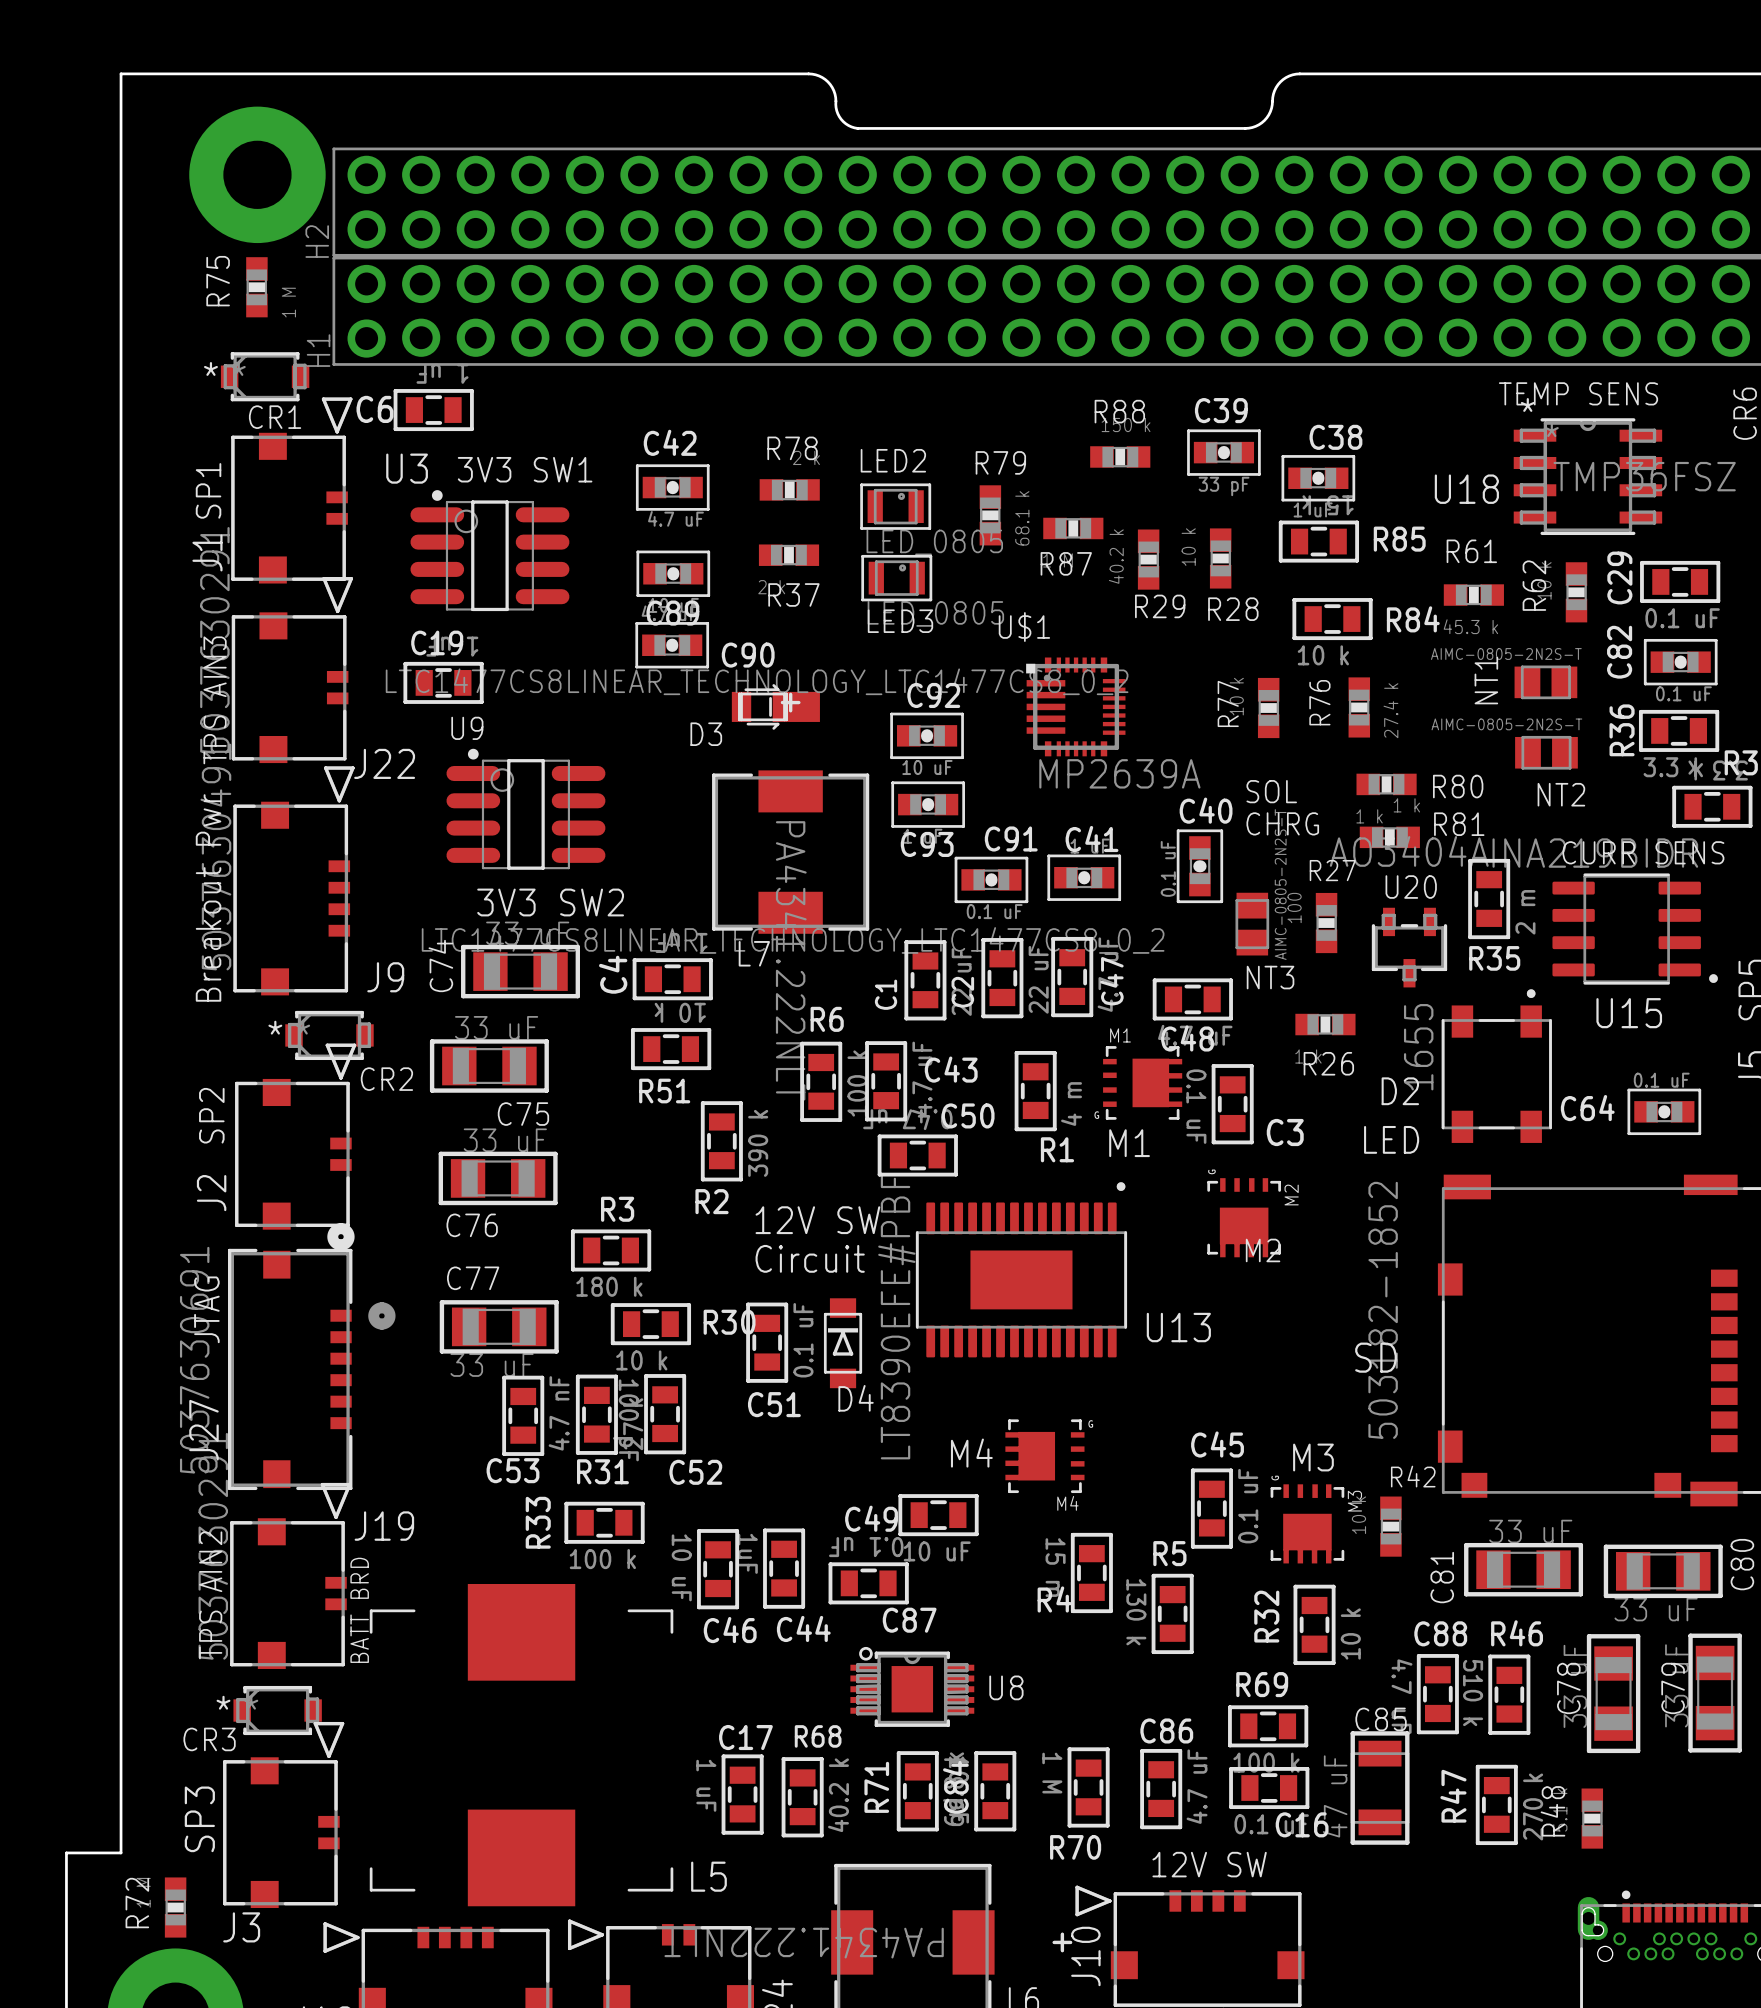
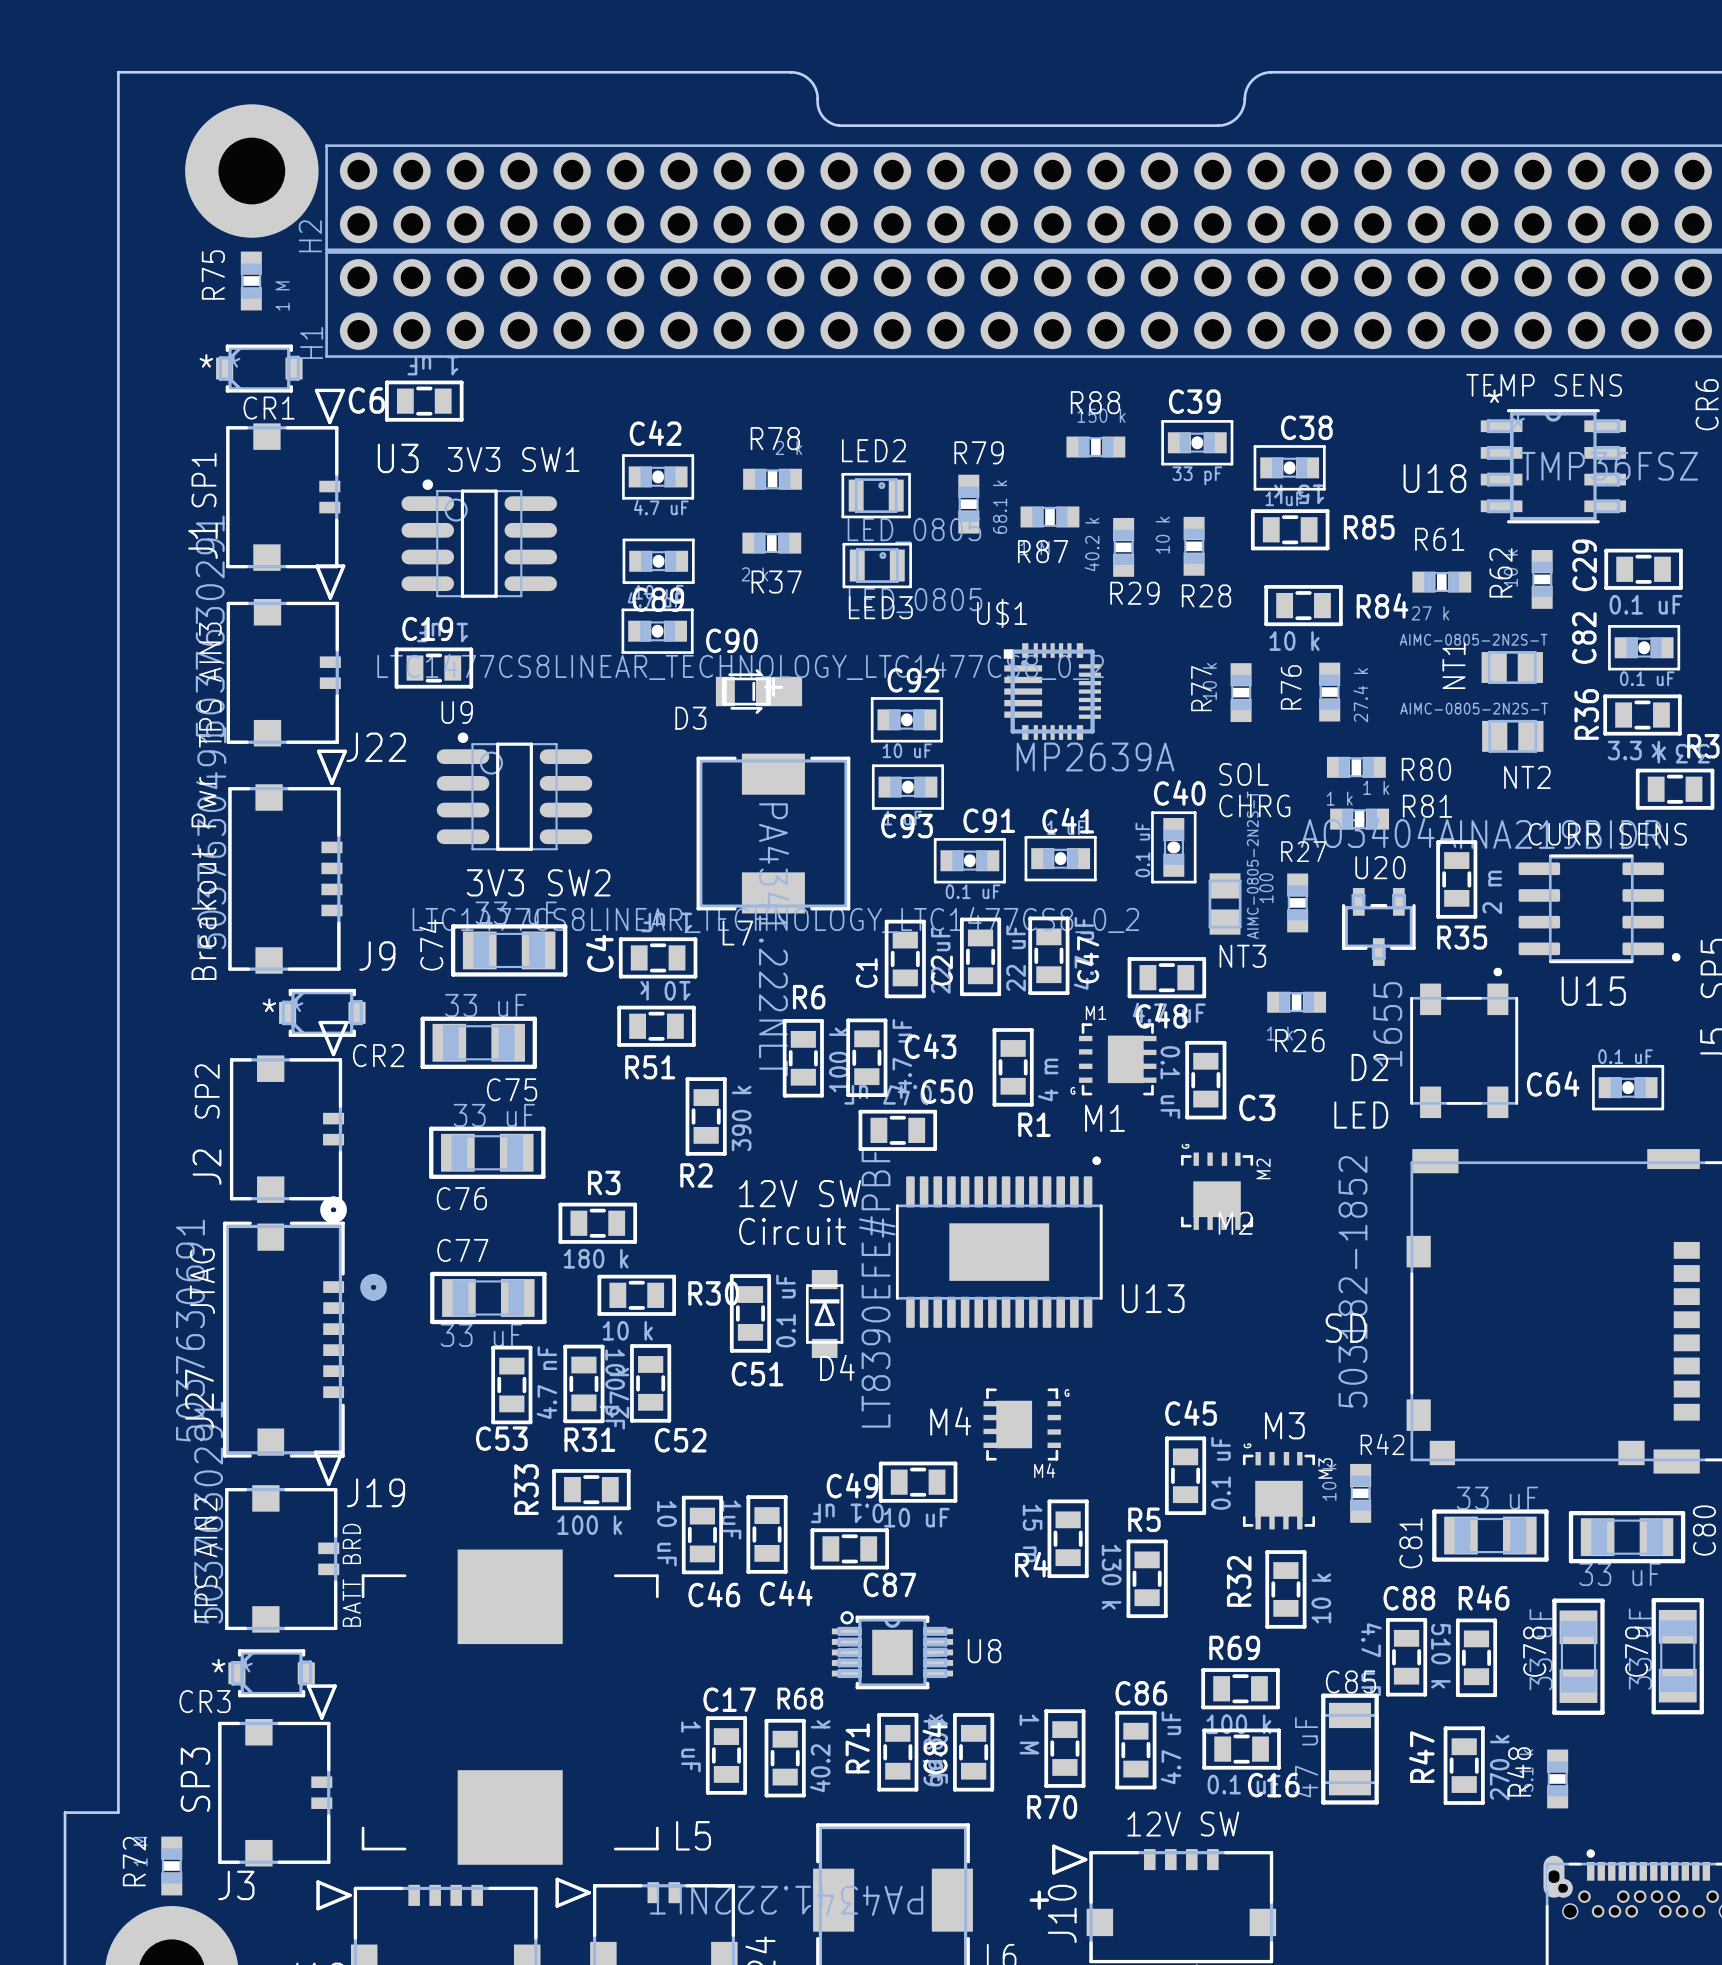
R61 value: 45.3 k (1470, 626) -> 27 k (1430, 613)

